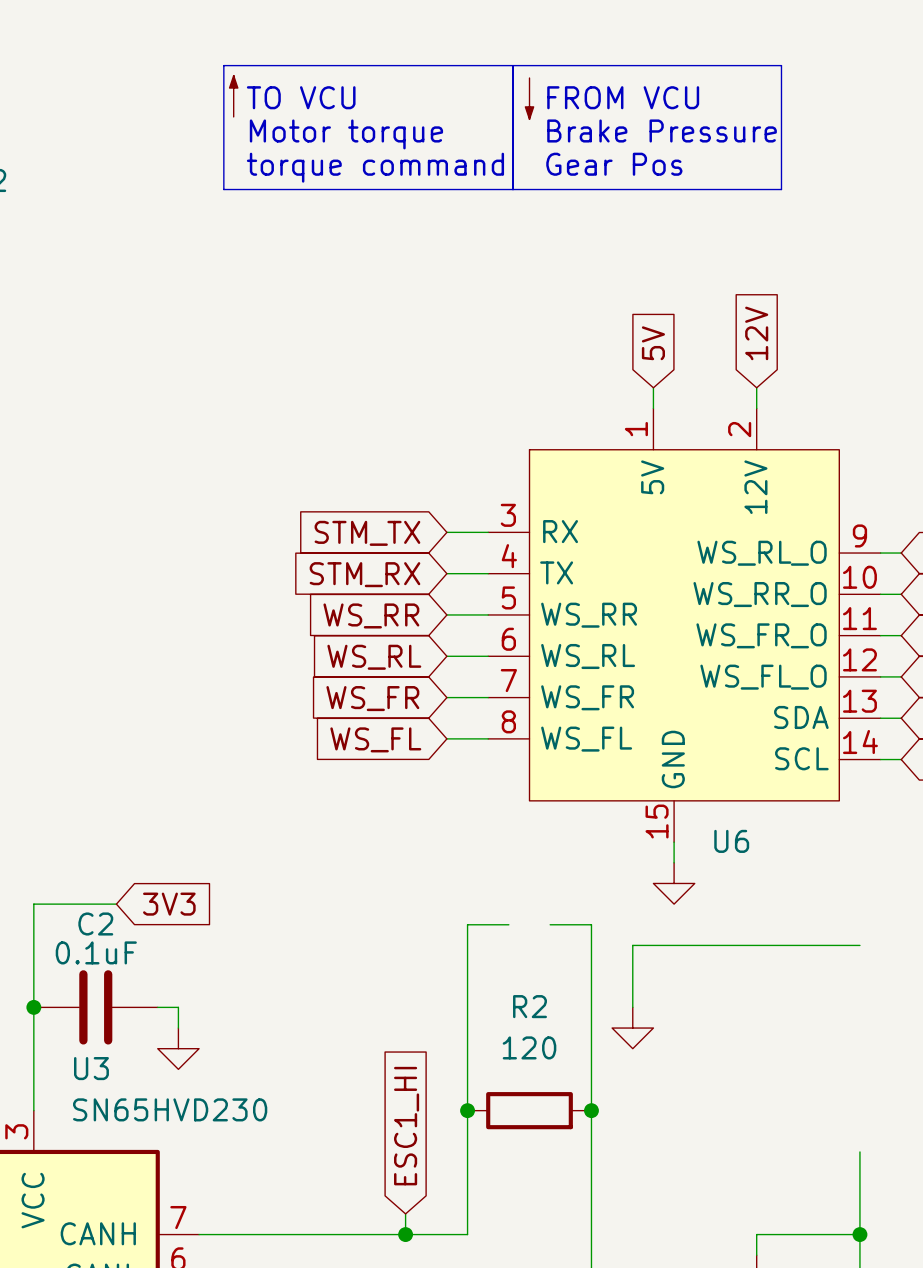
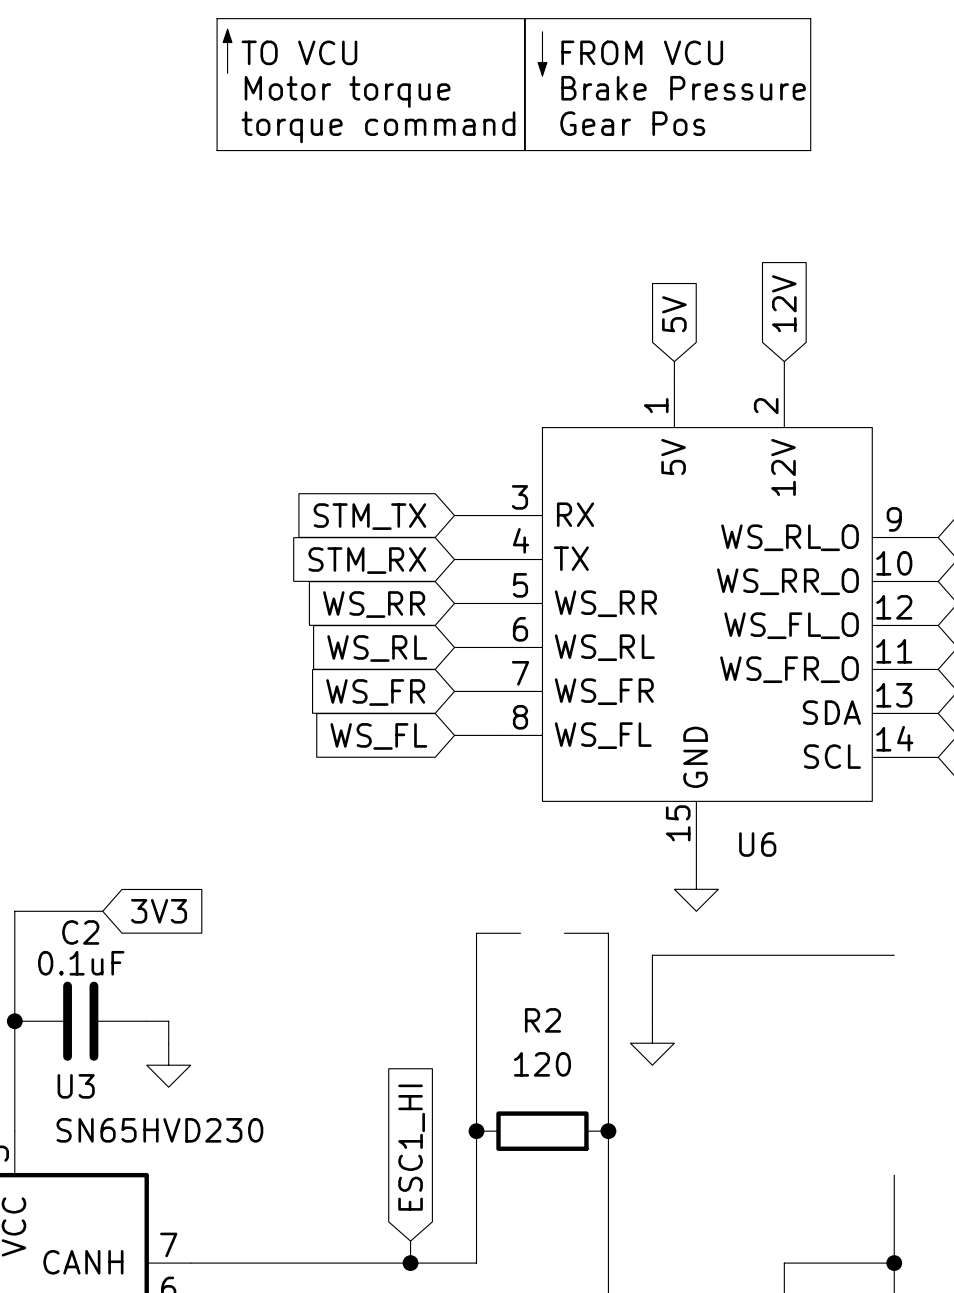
U6 pin number: 11 (859, 618) -> 12 (894, 607)
U6 pin name: WS_FR_O (761, 635) -> WS_FL_O (791, 625)
U6 pin number: 12 (859, 659) -> 11 (894, 651)
U6 pin name: WS_FL_O (763, 677) -> WS_FR_O (789, 669)

